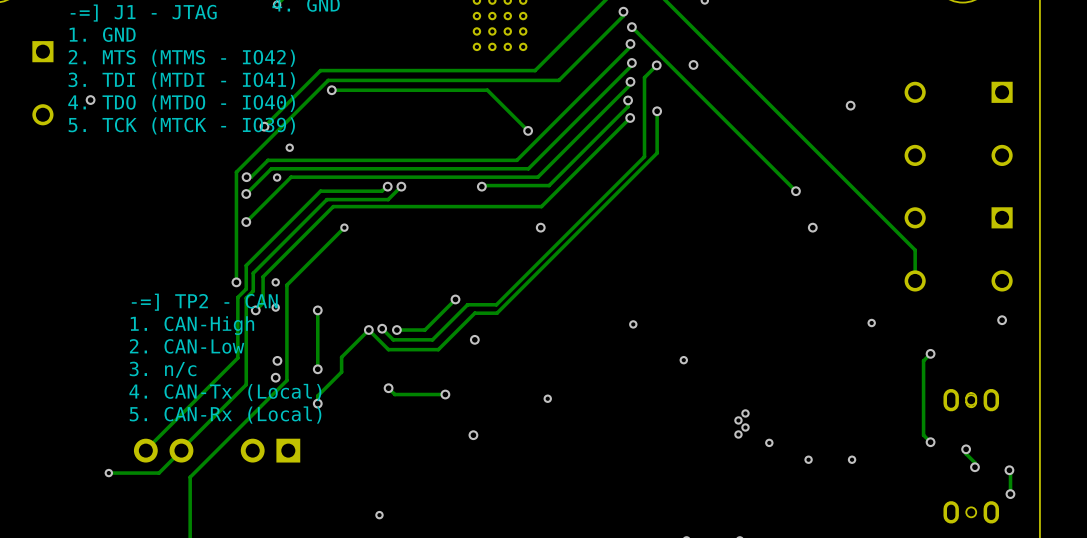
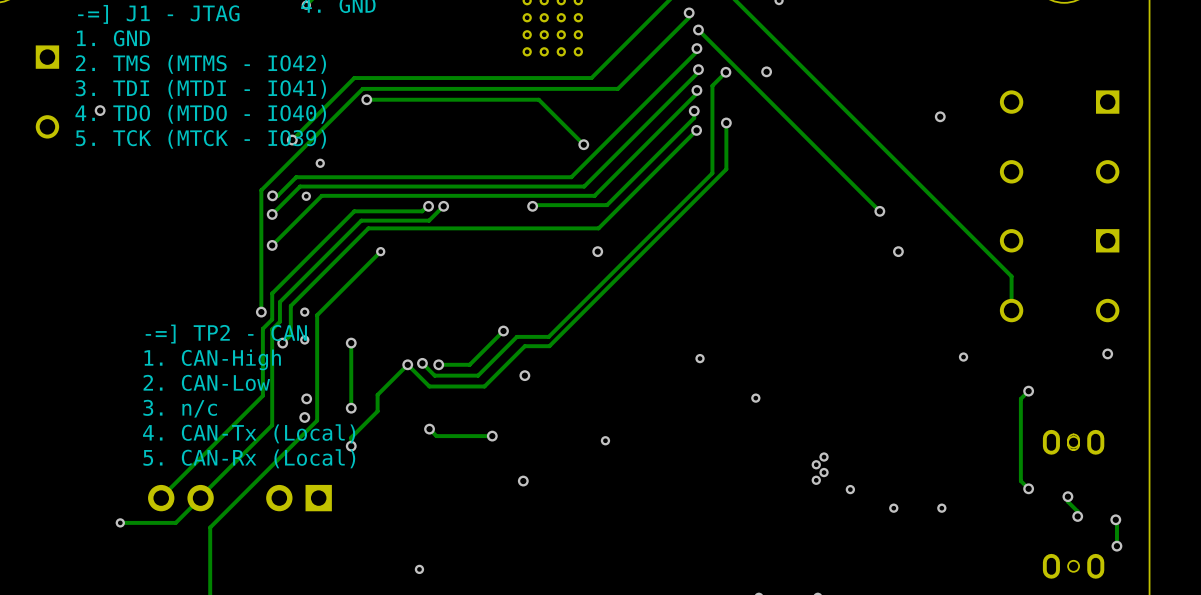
text: 2. MTS (MTMS - IO42) (181, 58) -> 2. TMS (MTMS - IO42) (200, 64)

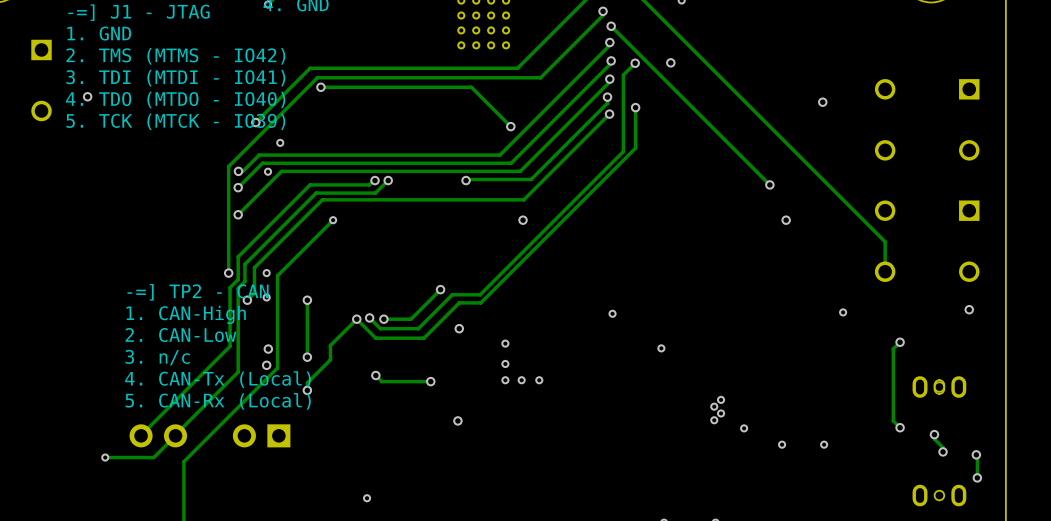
via: none -> (505, 343)
via: none -> (505, 363)
via: none -> (505, 380)
via: none -> (521, 380)
via: none -> (539, 380)
via: (605, 440) -> none

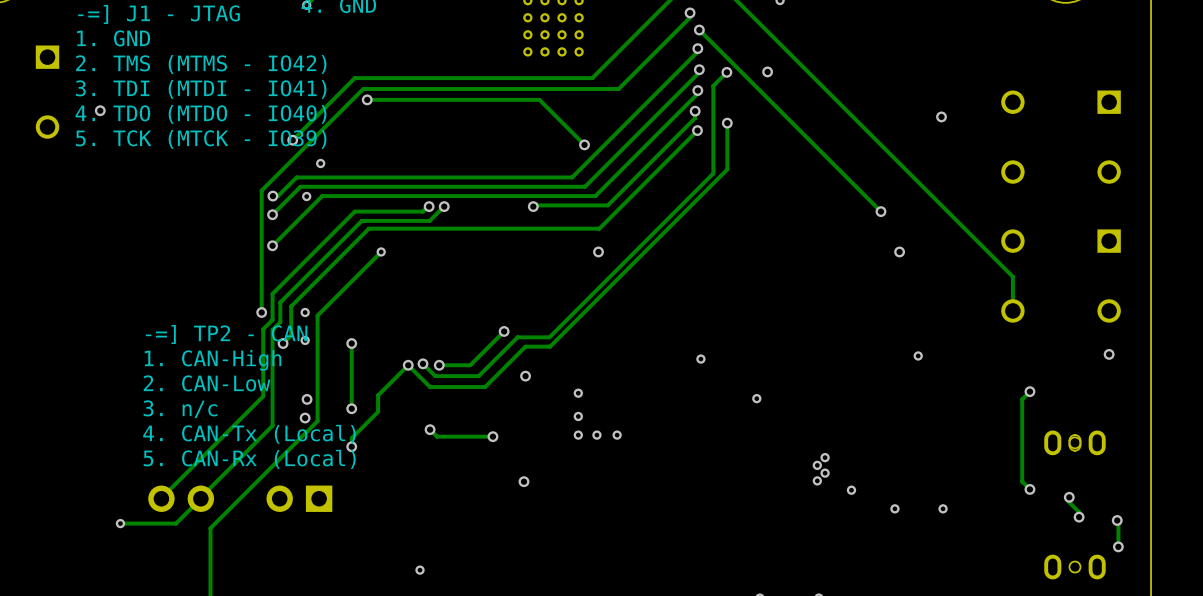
via position: (843, 312) -> (918, 355)

